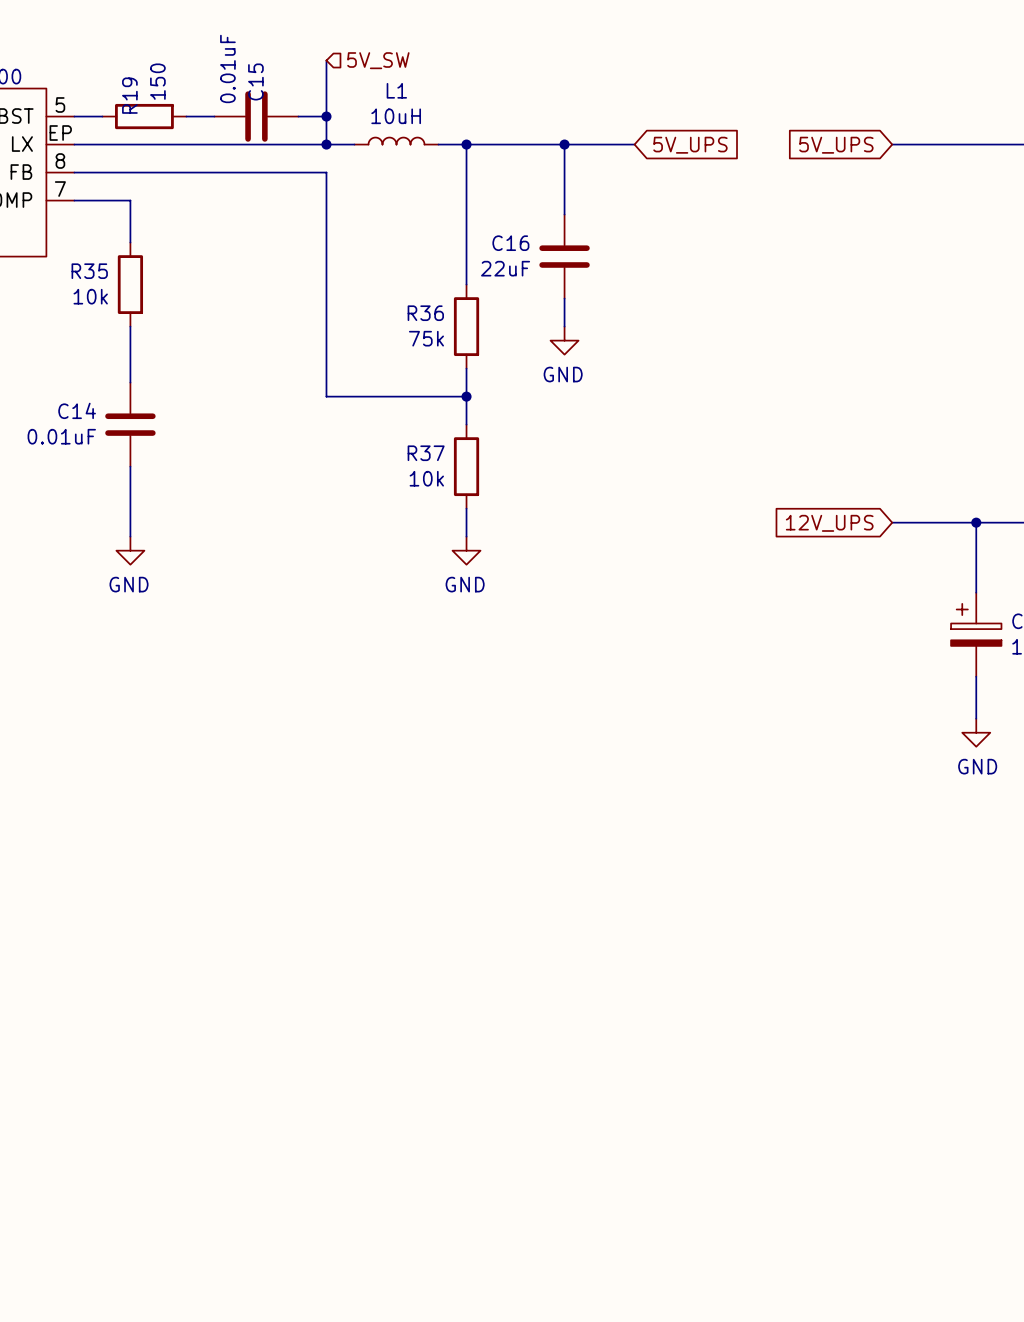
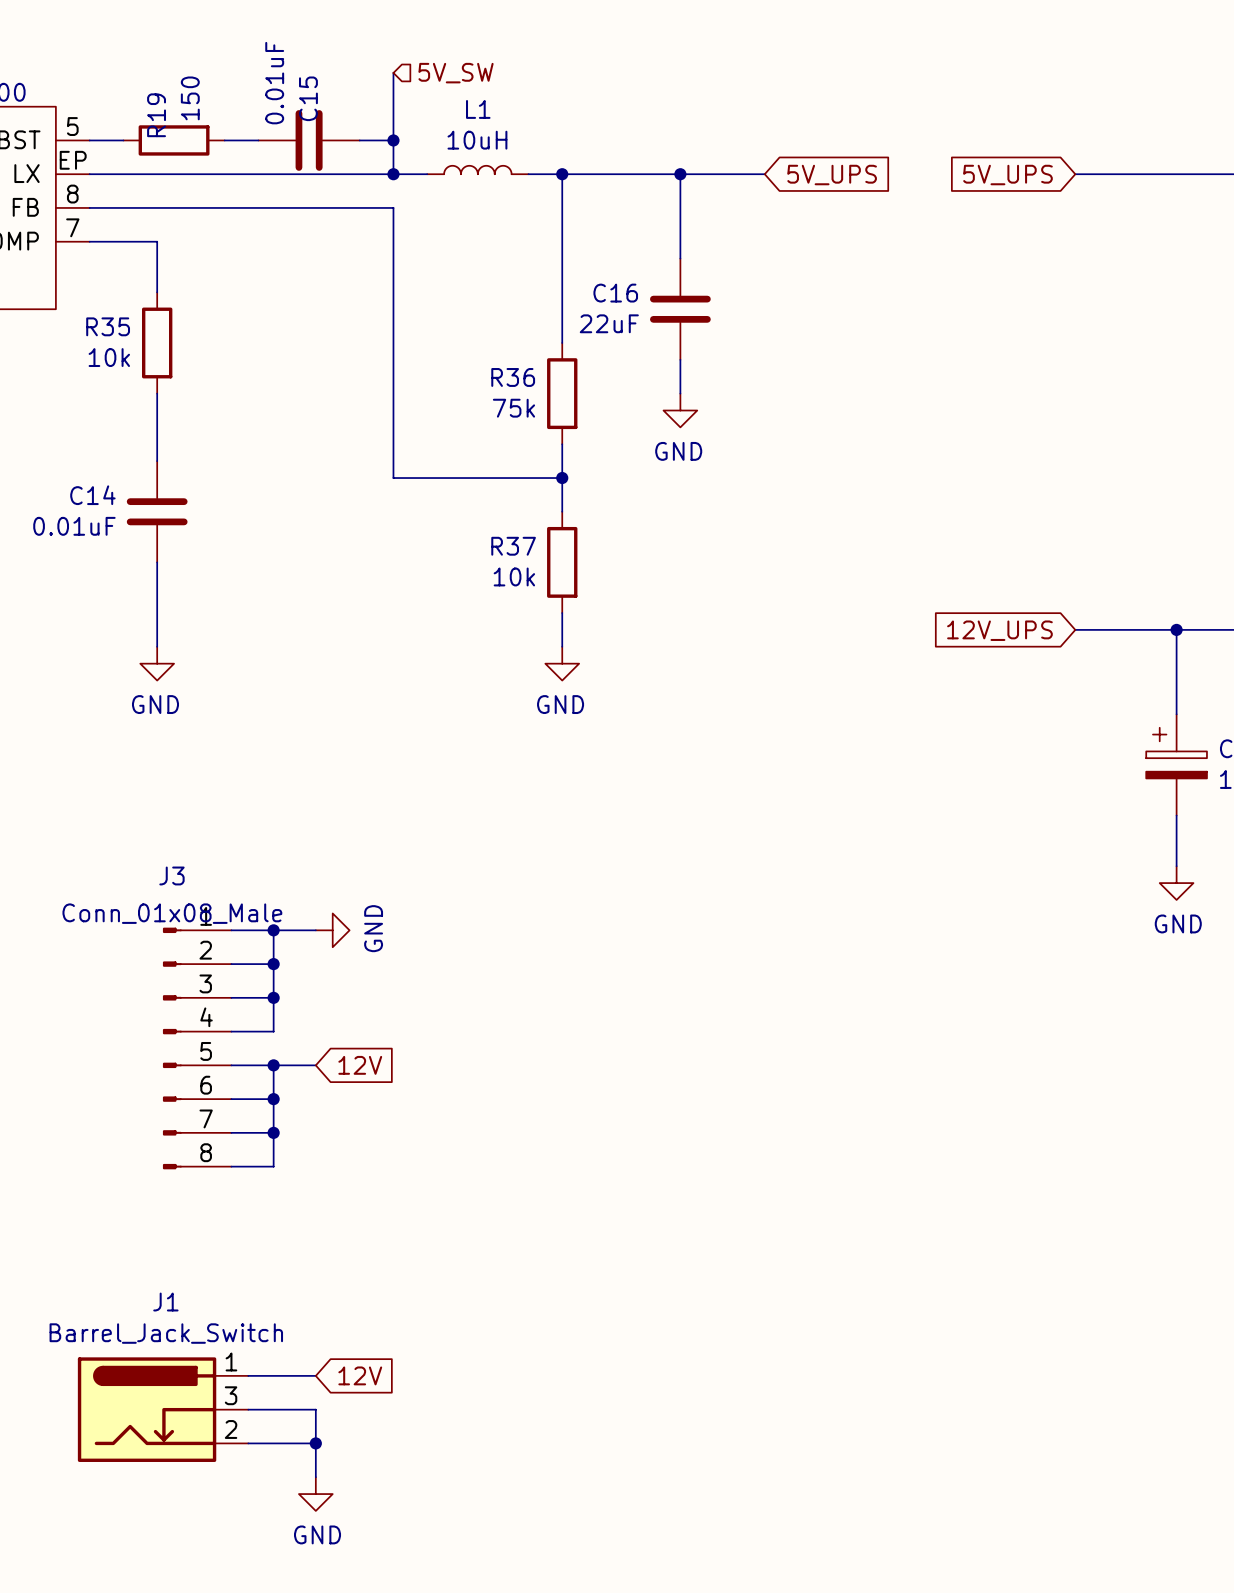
wire: none -> (231, 930) (315, 930)
wire: none -> (273, 930) (273, 1031) (231, 1031)
junction: none -> (273, 930)
power symbol: none -> GND (332, 930)
wire: none -> (231, 964) (273, 964)
junction: none -> (273, 964)
wire: none -> (231, 997) (273, 997)
junction: none -> (273, 997)
J3: none -> Conn_01x08_Male (197, 1048)
wire: none -> (231, 1065) (315, 1065)
wire: none -> (273, 1065) (273, 1166) (231, 1166)
junction: none -> (273, 1065)
global label: none -> 12V (360, 1065)
wire: none -> (231, 1099) (273, 1099)
junction: none -> (273, 1099)
wire: none -> (231, 1132) (273, 1132)
junction: none -> (273, 1132)
wire: none -> (248, 1375) (315, 1375)
global label: none -> 12V (360, 1375)
J1: none -> Barrel_Jack_Switch (163, 1409)
wire: none -> (248, 1409) (315, 1409) (315, 1477)
wire: none -> (248, 1443) (315, 1443)
junction: none -> (315, 1443)
power symbol: none -> GND (315, 1494)

